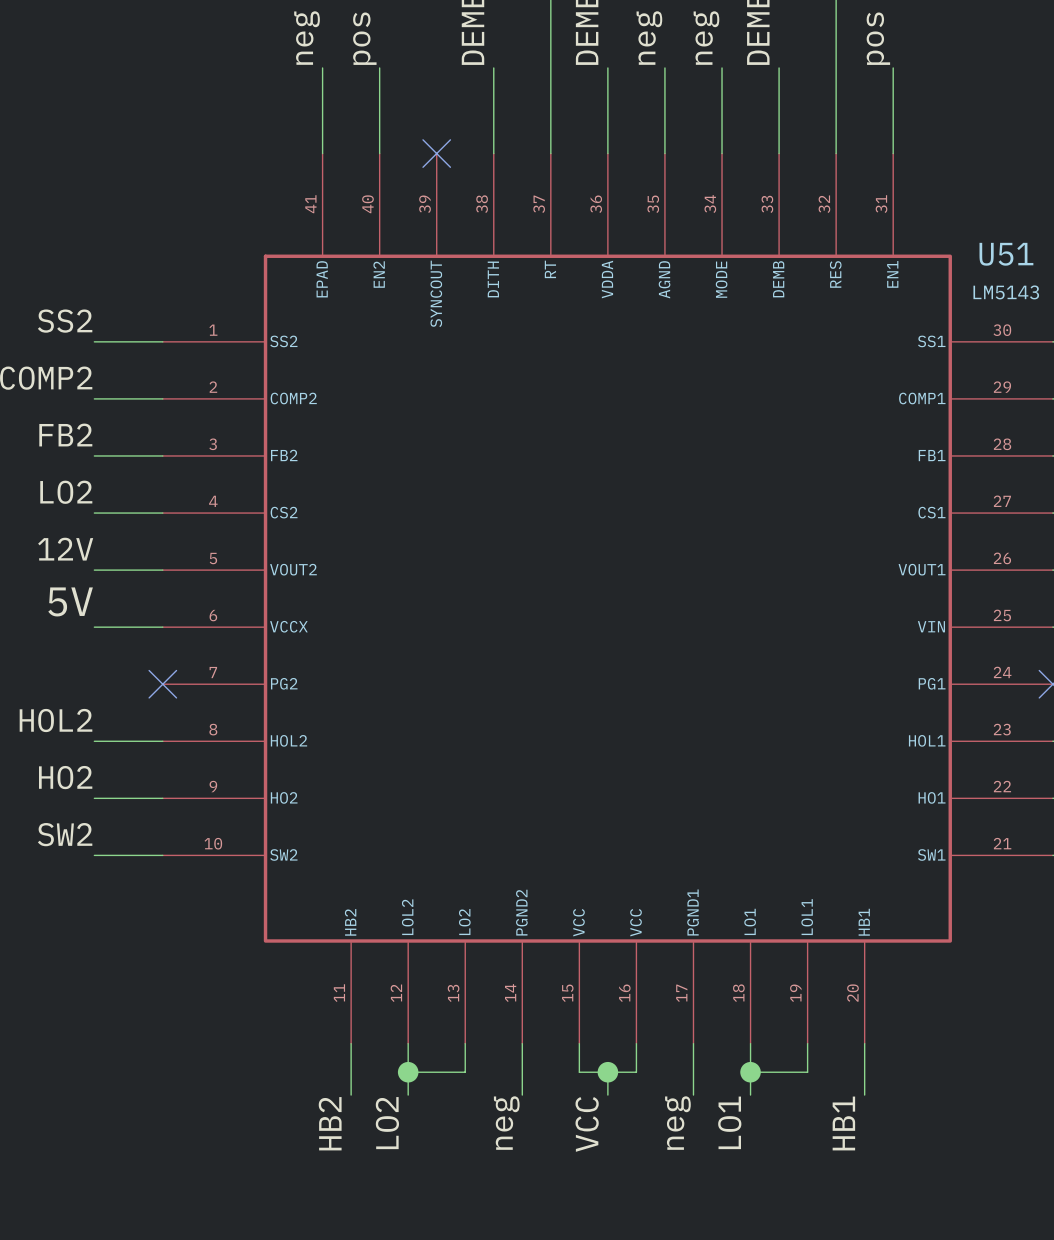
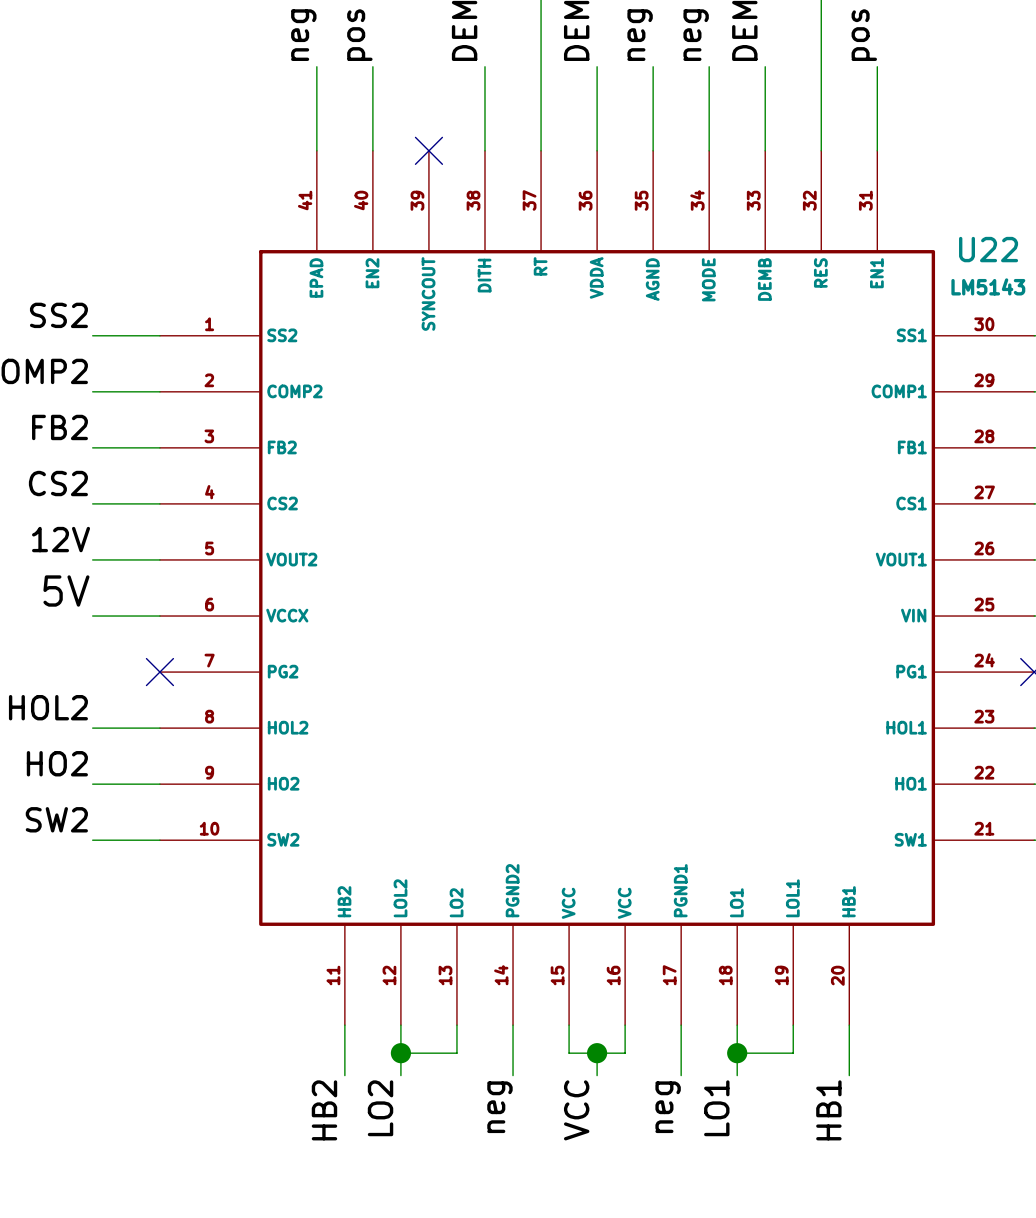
U51 name: U51 (1006, 254) -> U22 (988, 249)
label: LO2 (66, 492) -> CS2 (58, 483)

